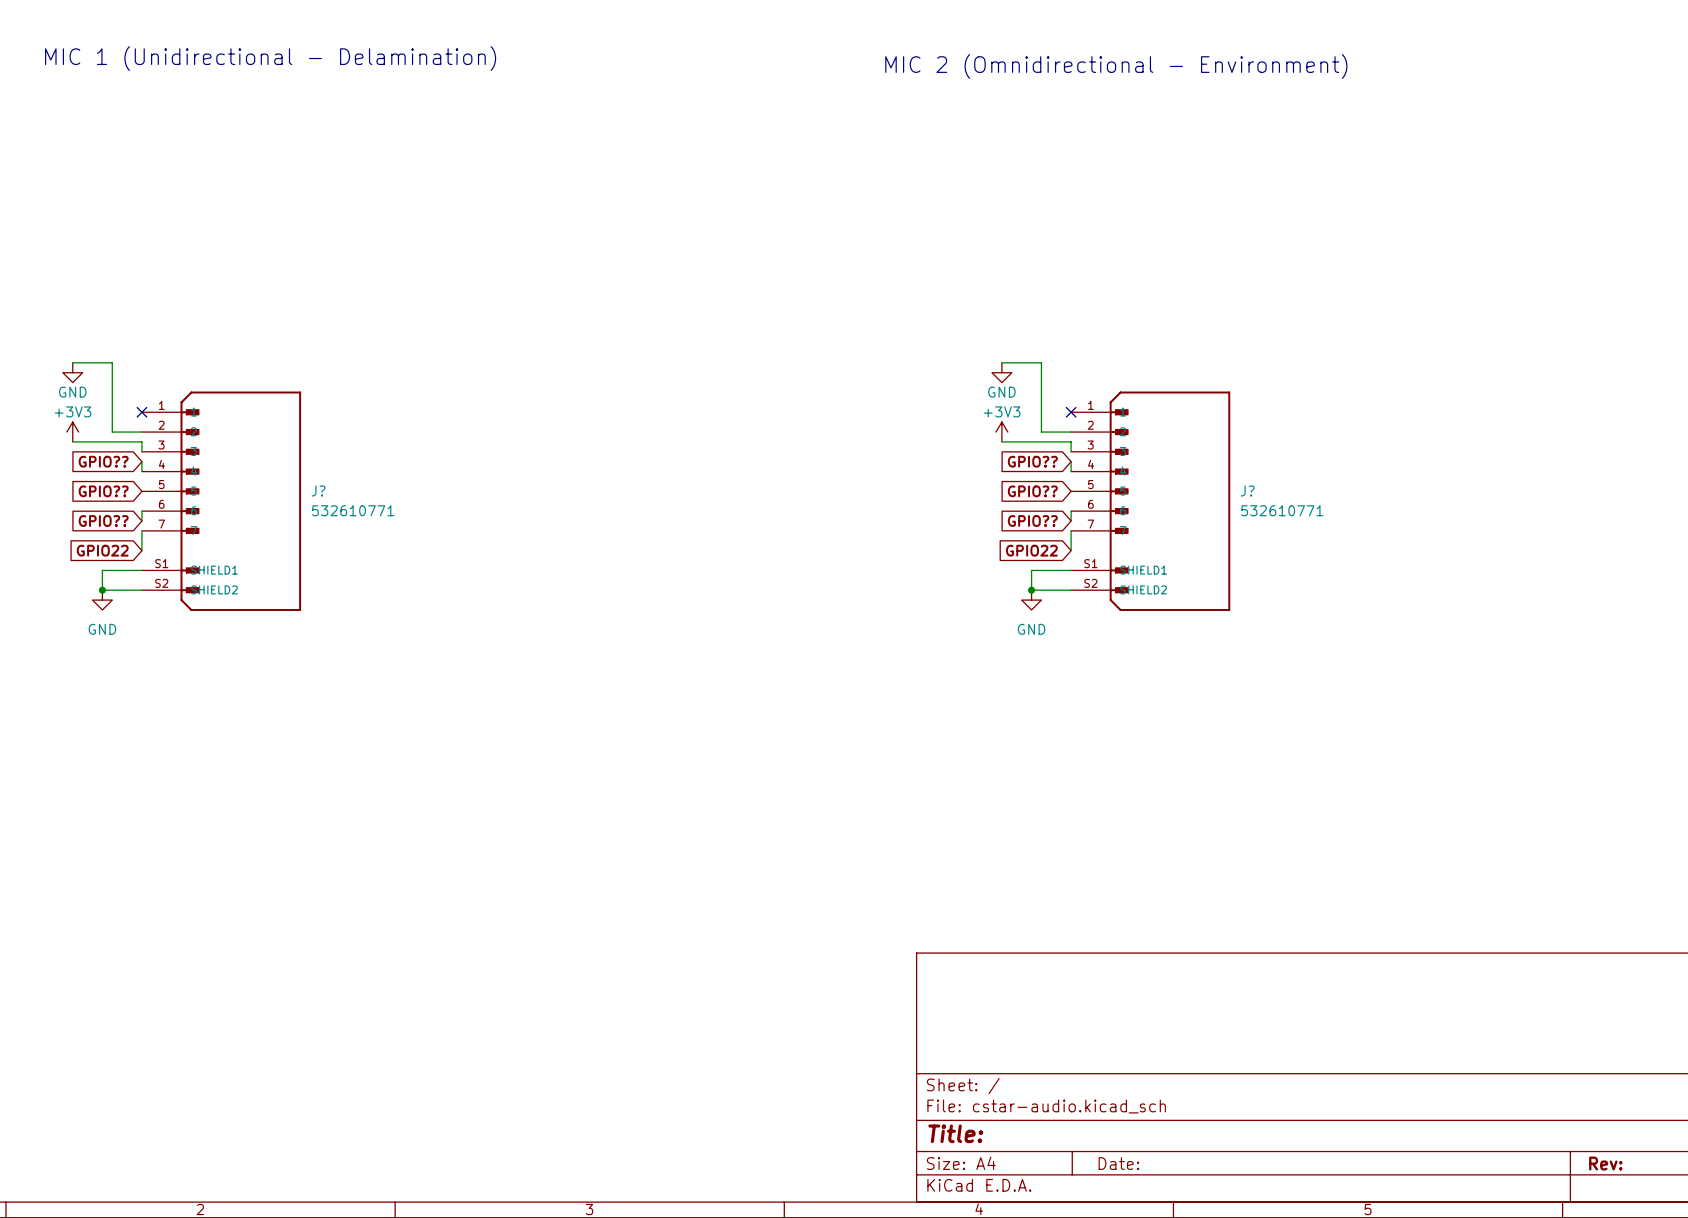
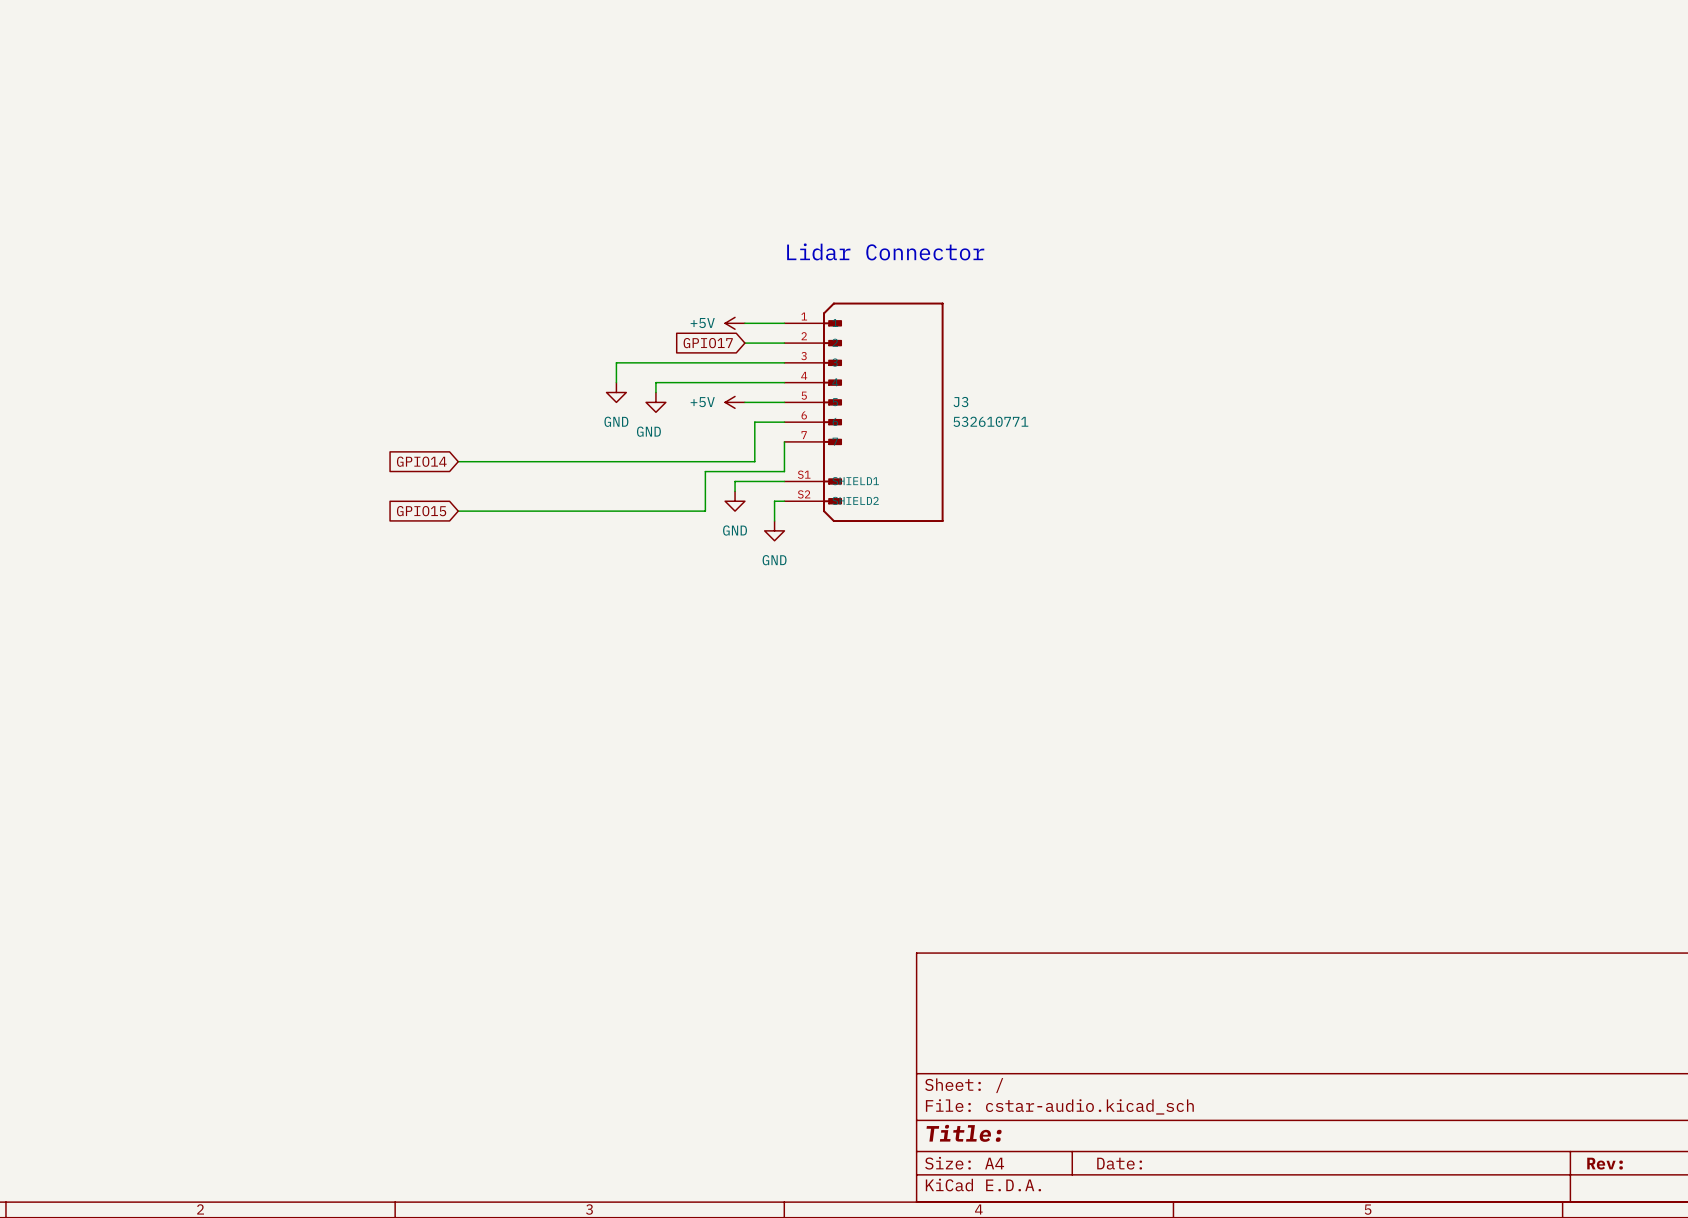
text: MIC 1 (Unidirectional - Delamination) (270, 58) -> none
text: MIC 2 (Omnidirectional - Environment) (1116, 66) -> none
text: none -> Lidar Connector (885, 251)
power symbol: none -> +5V (735, 323)
wire: none -> (744, 323) (784, 323)
global label: none -> GPIO17 (708, 343)
wire: none -> (744, 343) (784, 343)
wire: (72, 362) (112, 362) (112, 432) (141, 432) -> none
wire: none -> (784, 362) (616, 362) (616, 382)
wire: (1001, 362) (1041, 362) (1041, 432) (1071, 432) -> none
power symbol: GND (72, 372) -> none
power symbol: GND (1001, 372) -> none
wire: none -> (784, 382) (655, 382) (655, 392)
power symbol: none -> GND (616, 392)
power symbol: none -> GND (655, 402)
power symbol: none -> +5V (735, 402)
wire: none -> (744, 402) (784, 402)
no-connect mark: (141, 412) -> none
J3: none -> 532610771 (864, 412)
no-connect mark: (1071, 412) -> none
wire: none -> (784, 422) (754, 422) (754, 461) (458, 461)
power symbol: +3V3 (72, 432) -> none
power symbol: +3V3 (1001, 432) -> none
wire: (72, 441) (141, 441) (141, 451) -> none
wire: none -> (784, 441) (784, 471) (705, 471) (705, 511) (458, 511)
wire: (1001, 441) (1071, 441) (1071, 451) -> none
global label: GPIO?? (103, 461) -> none
wire: (141, 461) (141, 471) -> none
global label: none -> GPIO14 (421, 461)
global label: GPIO?? (1032, 461) -> none
wire: (1071, 461) (1071, 471) -> none
wire: none -> (784, 481) (735, 481) (735, 491)
global label: GPIO?? (103, 491) -> none
global label: GPIO?? (1032, 491) -> none
J?: 532610771 (221, 501) -> none
power symbol: none -> GND (735, 501)
wire: none -> (784, 501) (774, 501) (774, 521)
J?: 532610771 (1150, 501) -> none
wire: (141, 511) (141, 521) -> none
global label: none -> GPIO15 (421, 511)
wire: (1071, 511) (1071, 521) -> none
global label: GPIO?? (103, 521) -> none
global label: GPIO?? (1032, 521) -> none
wire: (141, 530) (141, 550) -> none
power symbol: none -> GND (774, 530)
wire: (1071, 530) (1071, 550) -> none
global label: GPIO22 (102, 550) -> none
global label: GPIO22 (1031, 550) -> none
wire: (141, 570) (102, 570) (102, 590) (141, 590) -> none
wire: (1071, 570) (1031, 570) (1031, 590) (1071, 590) -> none
junction: (102, 590) -> none
junction: (1031, 590) -> none
power symbol: GND (102, 600) -> none
power symbol: GND (1031, 600) -> none

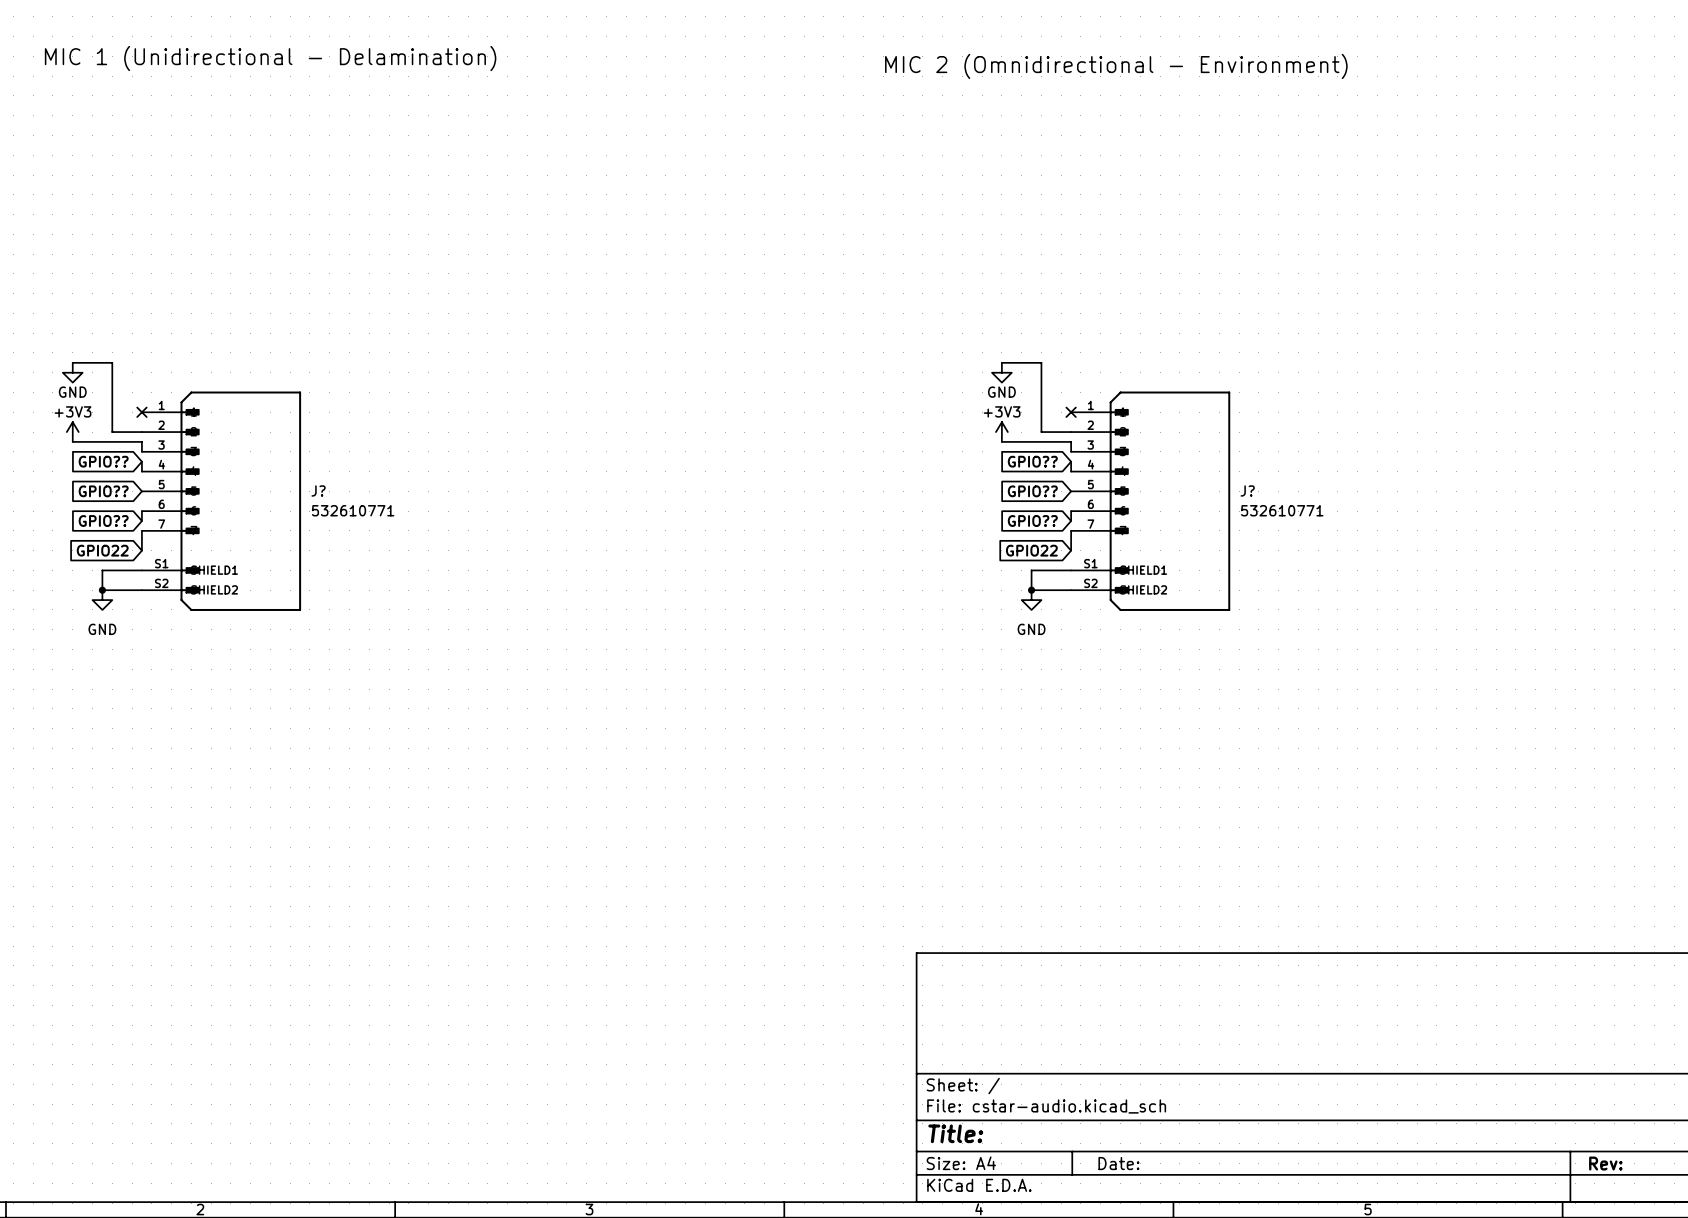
text: none -> MIC 1 (Unidirectional - Delamination) (270, 58)
text: none -> MIC 2 (Omnidirectional - Environment) (1116, 66)
text: Lidar Connector (885, 251) -> none
power symbol: +5V (735, 323) -> none
wire: (744, 323) (784, 323) -> none
global label: GPIO17 (708, 343) -> none
wire: (744, 343) (784, 343) -> none
wire: none -> (72, 362) (112, 362) (112, 432) (141, 432)
wire: (784, 362) (616, 362) (616, 382) -> none
wire: none -> (1001, 362) (1041, 362) (1041, 432) (1071, 432)
power symbol: none -> GND (72, 372)
power symbol: none -> GND (1001, 372)
wire: (784, 382) (655, 382) (655, 392) -> none
power symbol: GND (616, 392) -> none
power symbol: GND (655, 402) -> none
power symbol: +5V (735, 402) -> none
wire: (744, 402) (784, 402) -> none
no-connect mark: none -> (141, 412)
J3: 532610771 (864, 412) -> none
no-connect mark: none -> (1071, 412)
wire: (784, 422) (754, 422) (754, 461) (458, 461) -> none
power symbol: none -> +3V3 (72, 432)
power symbol: none -> +3V3 (1001, 432)
wire: none -> (72, 441) (141, 441) (141, 451)
wire: (784, 441) (784, 471) (705, 471) (705, 511) (458, 511) -> none
wire: none -> (1001, 441) (1071, 441) (1071, 451)
global label: none -> GPIO?? (103, 461)
wire: none -> (141, 461) (141, 471)
global label: GPIO14 (421, 461) -> none
global label: none -> GPIO?? (1032, 461)
wire: none -> (1071, 461) (1071, 471)
wire: (784, 481) (735, 481) (735, 491) -> none
global label: none -> GPIO?? (103, 491)
global label: none -> GPIO?? (1032, 491)
J?: none -> 532610771 (221, 501)
power symbol: GND (735, 501) -> none
wire: (784, 501) (774, 501) (774, 521) -> none
J?: none -> 532610771 (1150, 501)
wire: none -> (141, 511) (141, 521)
global label: GPIO15 (421, 511) -> none
wire: none -> (1071, 511) (1071, 521)
global label: none -> GPIO?? (103, 521)
global label: none -> GPIO?? (1032, 521)
wire: none -> (141, 530) (141, 550)
power symbol: GND (774, 530) -> none
wire: none -> (1071, 530) (1071, 550)
global label: none -> GPIO22 (102, 550)
global label: none -> GPIO22 (1031, 550)
wire: none -> (141, 570) (102, 570) (102, 590) (141, 590)
wire: none -> (1071, 570) (1031, 570) (1031, 590) (1071, 590)
junction: none -> (102, 590)
junction: none -> (1031, 590)
power symbol: none -> GND (102, 600)
power symbol: none -> GND (1031, 600)

